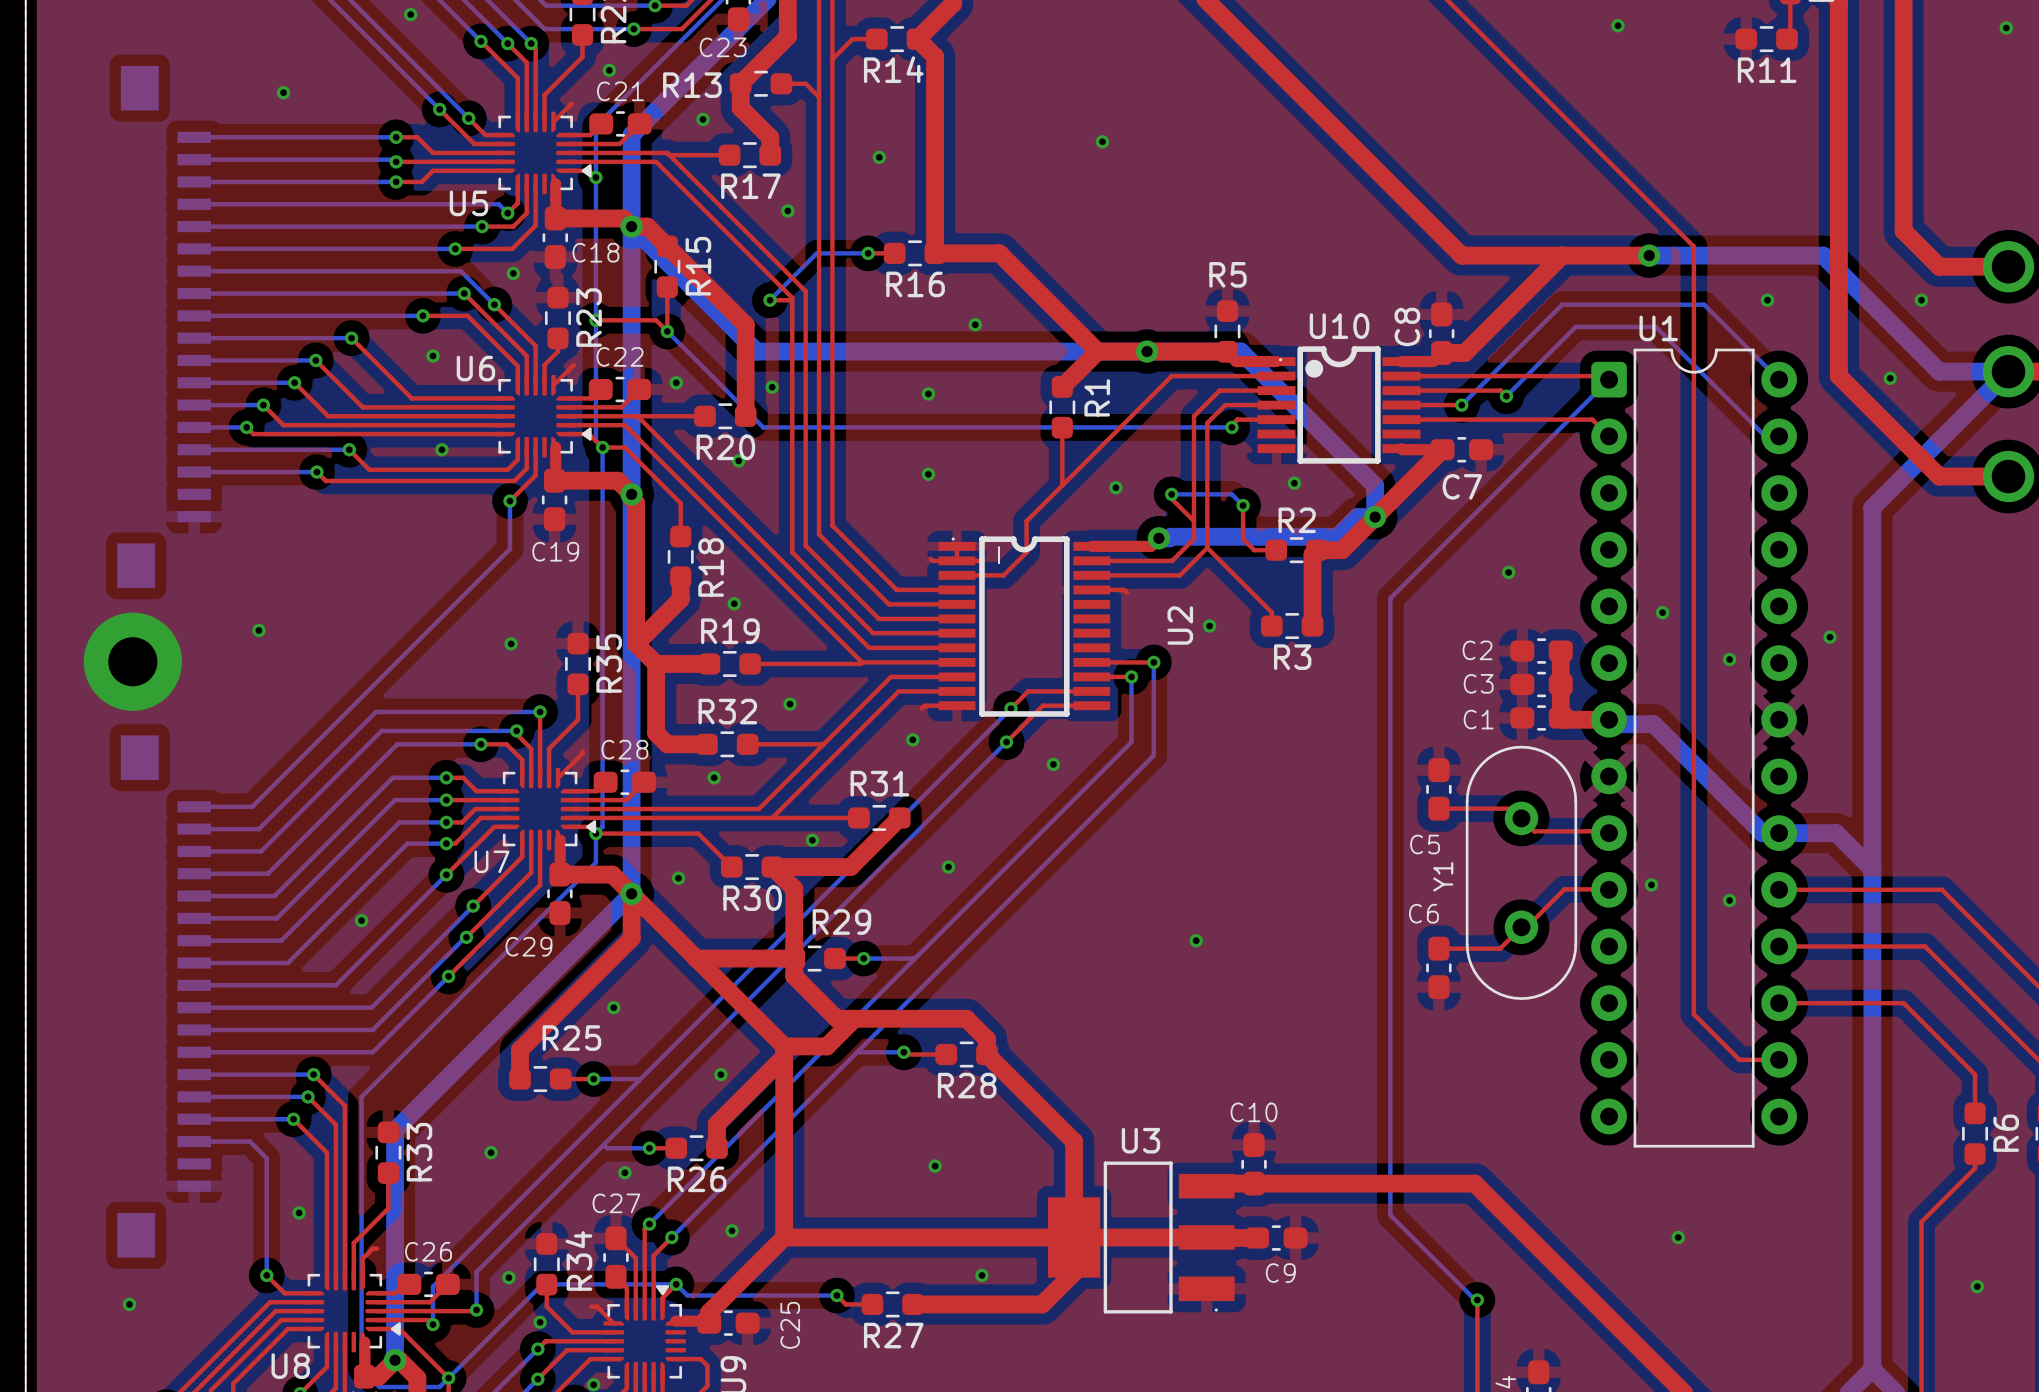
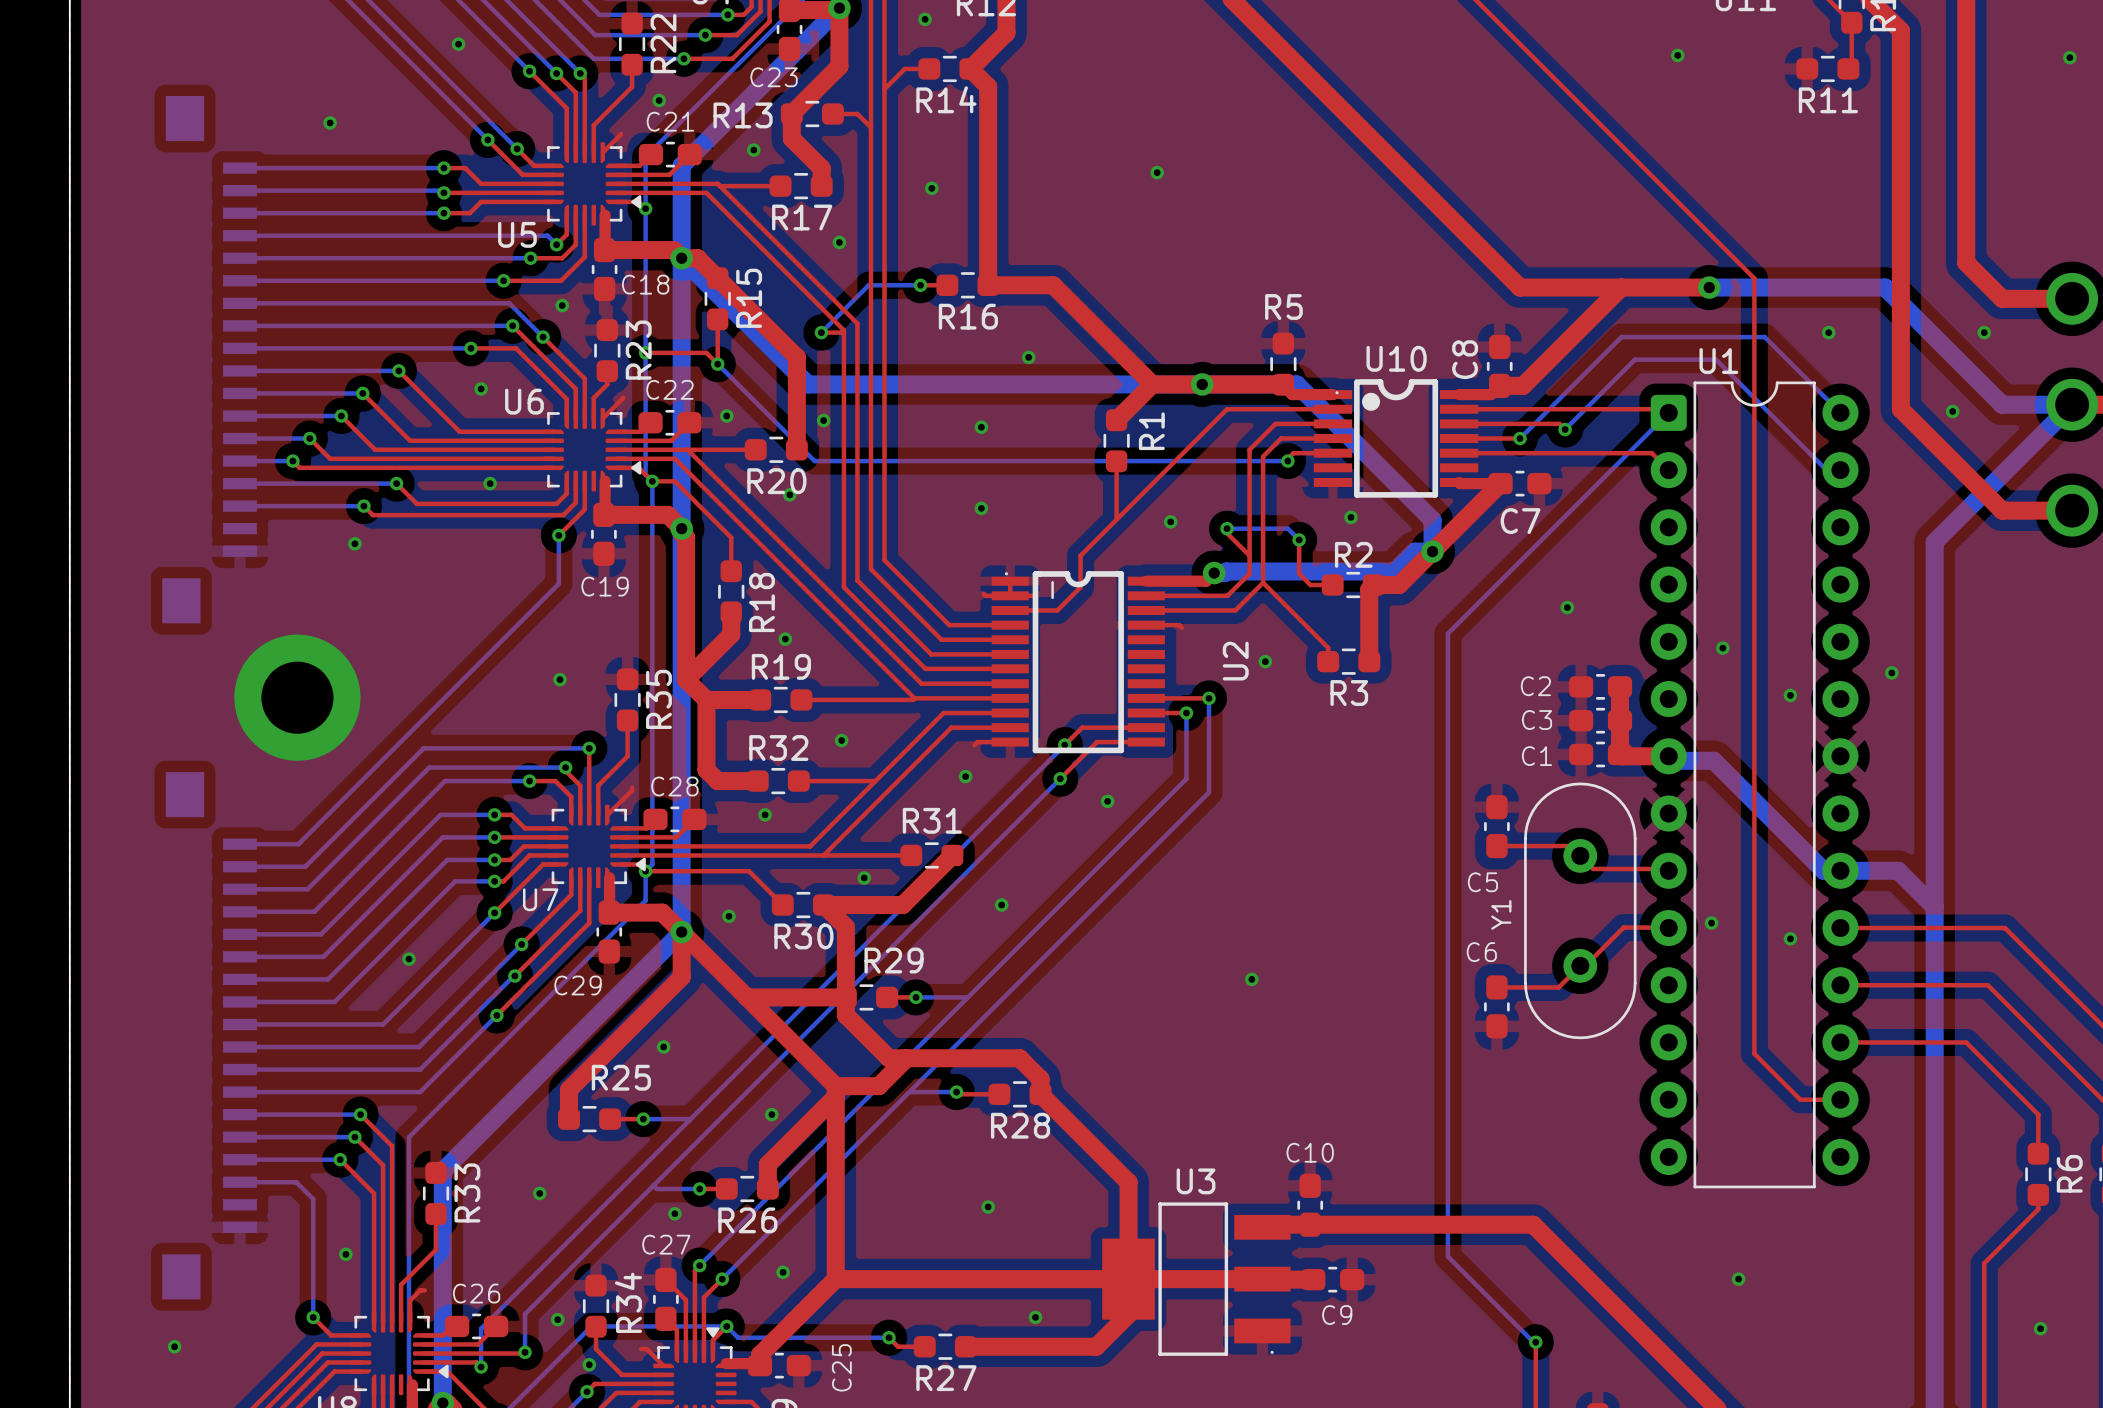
via position: (258, 630) -> (354, 543)
part: (132, 661) -> none
part: none -> (297, 697)

